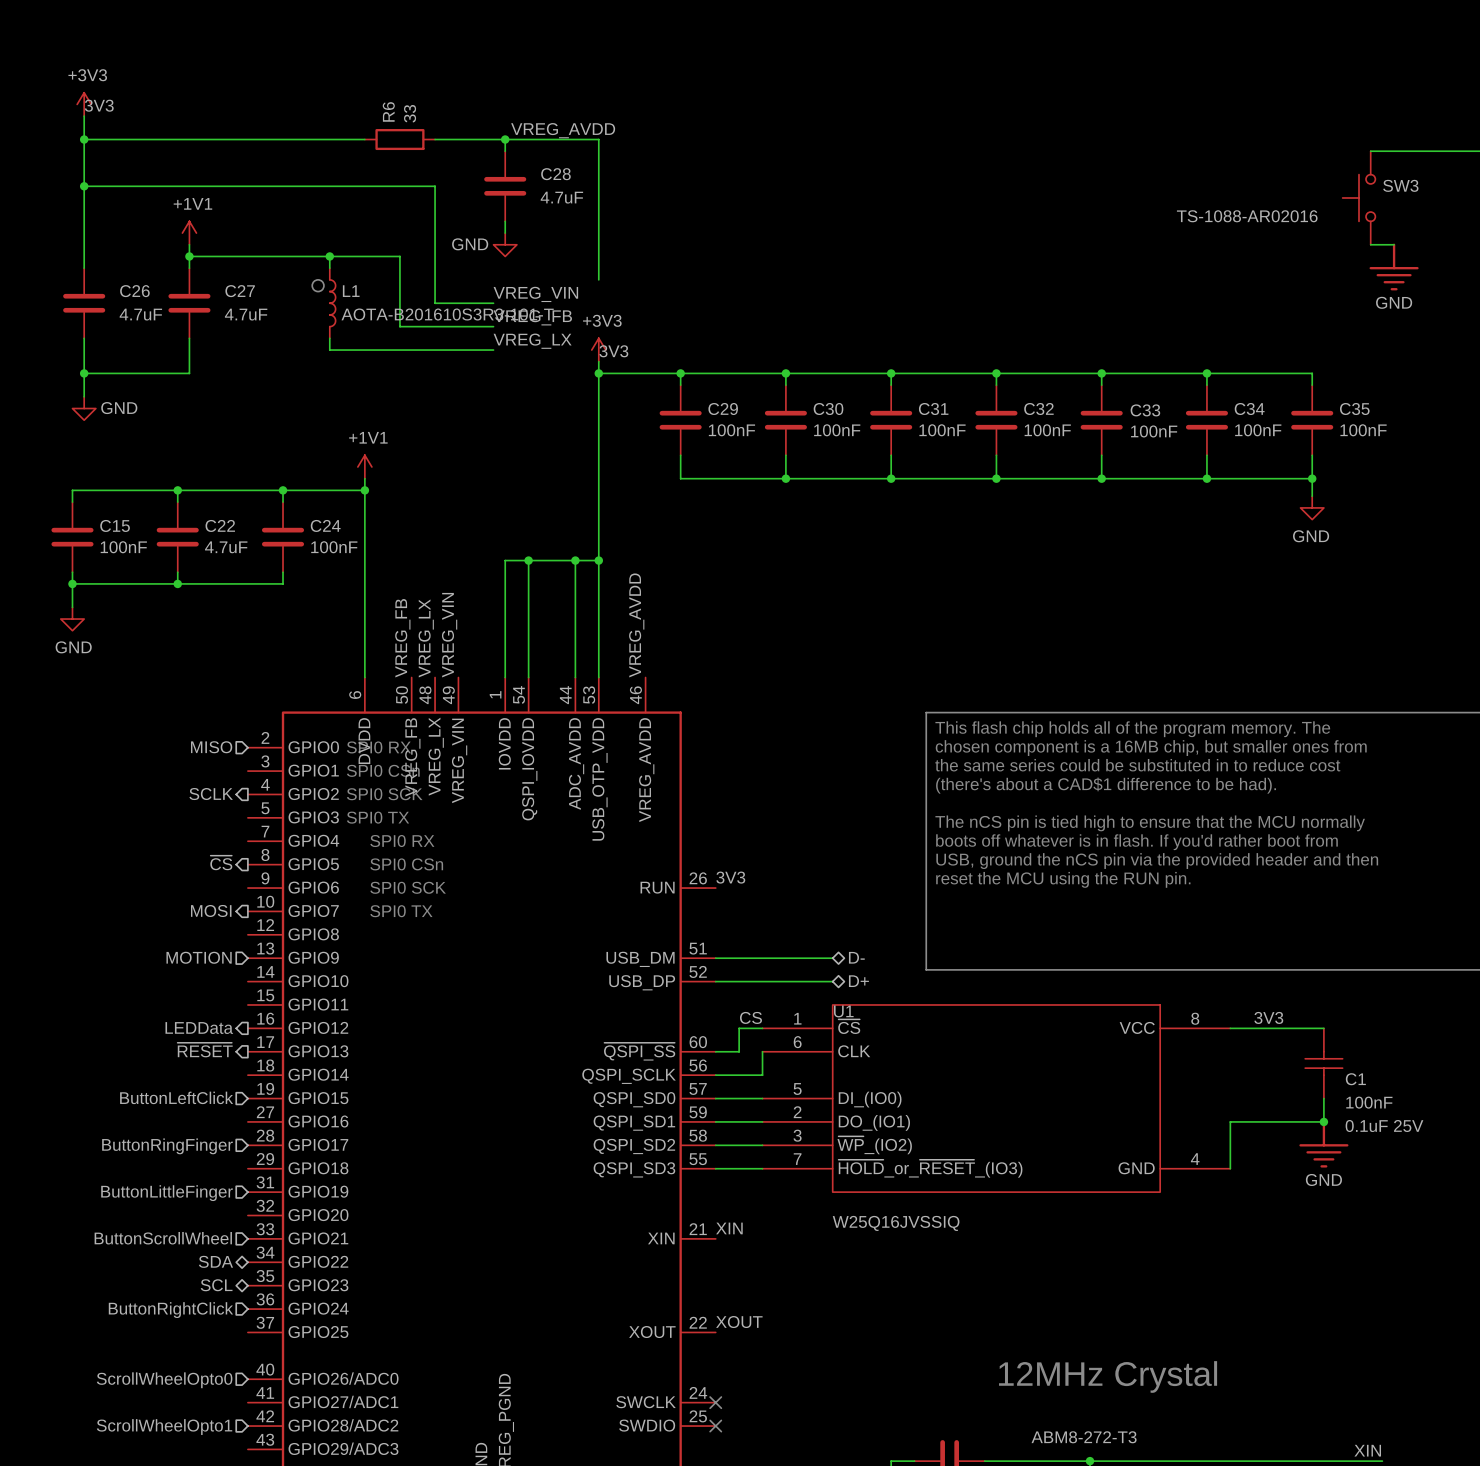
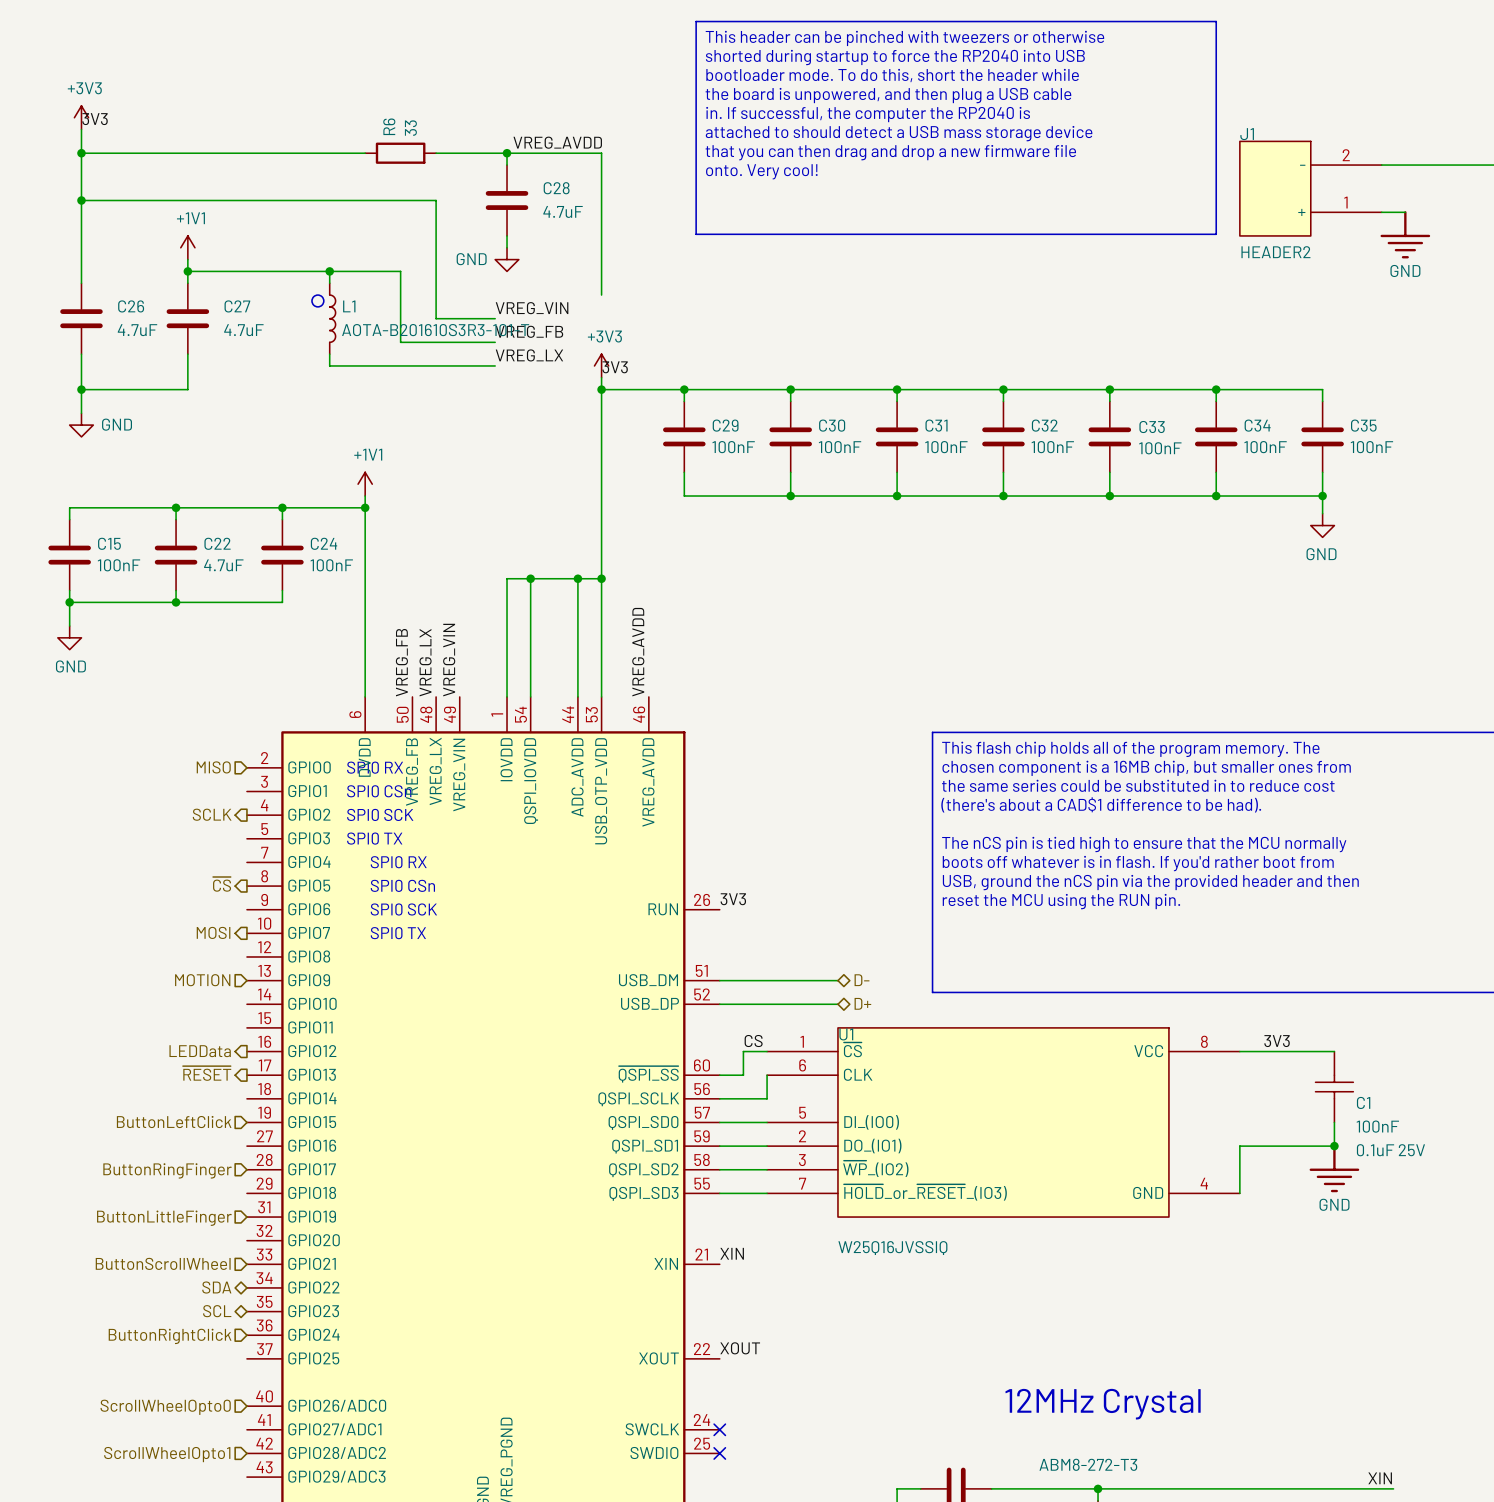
line: none -> (696, 21) (1216, 21) (1216, 234) (696, 234) (696, 21)
text: none -> This header can be pinched with tweezers or otherwise (904, 38)
text: none -> shorted during startup to force the RP2040 into USB (895, 57)
text: none -> bootloader mode. To do this, short the header while (892, 75)
text: none -> the board is unpowered, and then plug a USB cable (888, 95)
text: none -> in. If successful, the computer the RP2040 is (868, 114)
text: none -> attached to should detect a USB mass storage device (899, 133)
text: none -> that you can then drag and drop a new firmware file (890, 152)
text: none -> onto. Very cool! (761, 171)
J1: none -> HEADER2 (1310, 188)
SW3: TS-1088-AR02016 (1359, 197) -> none
wire: (1370, 244) (1394, 244) -> (1381, 212) (1405, 212)
power symbol position: GND (1394, 266) -> GND (1405, 234)

